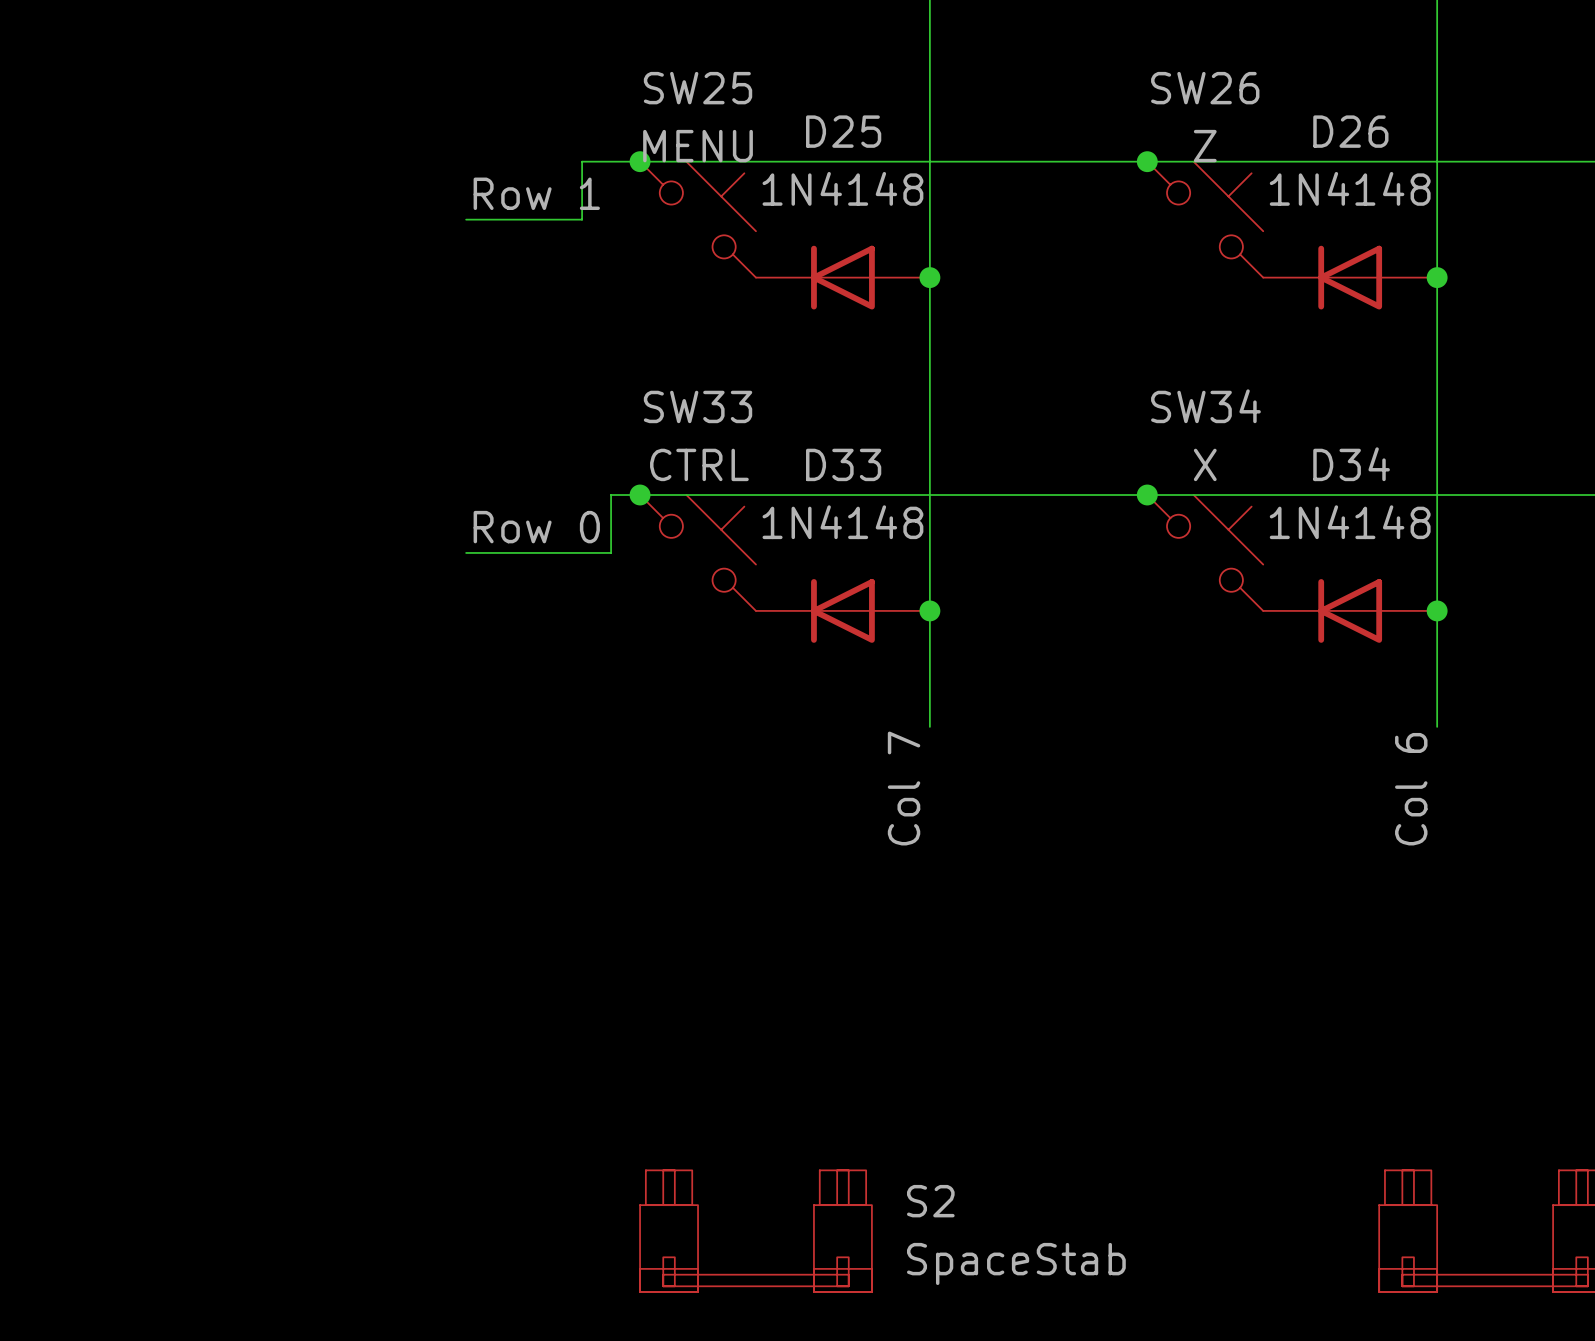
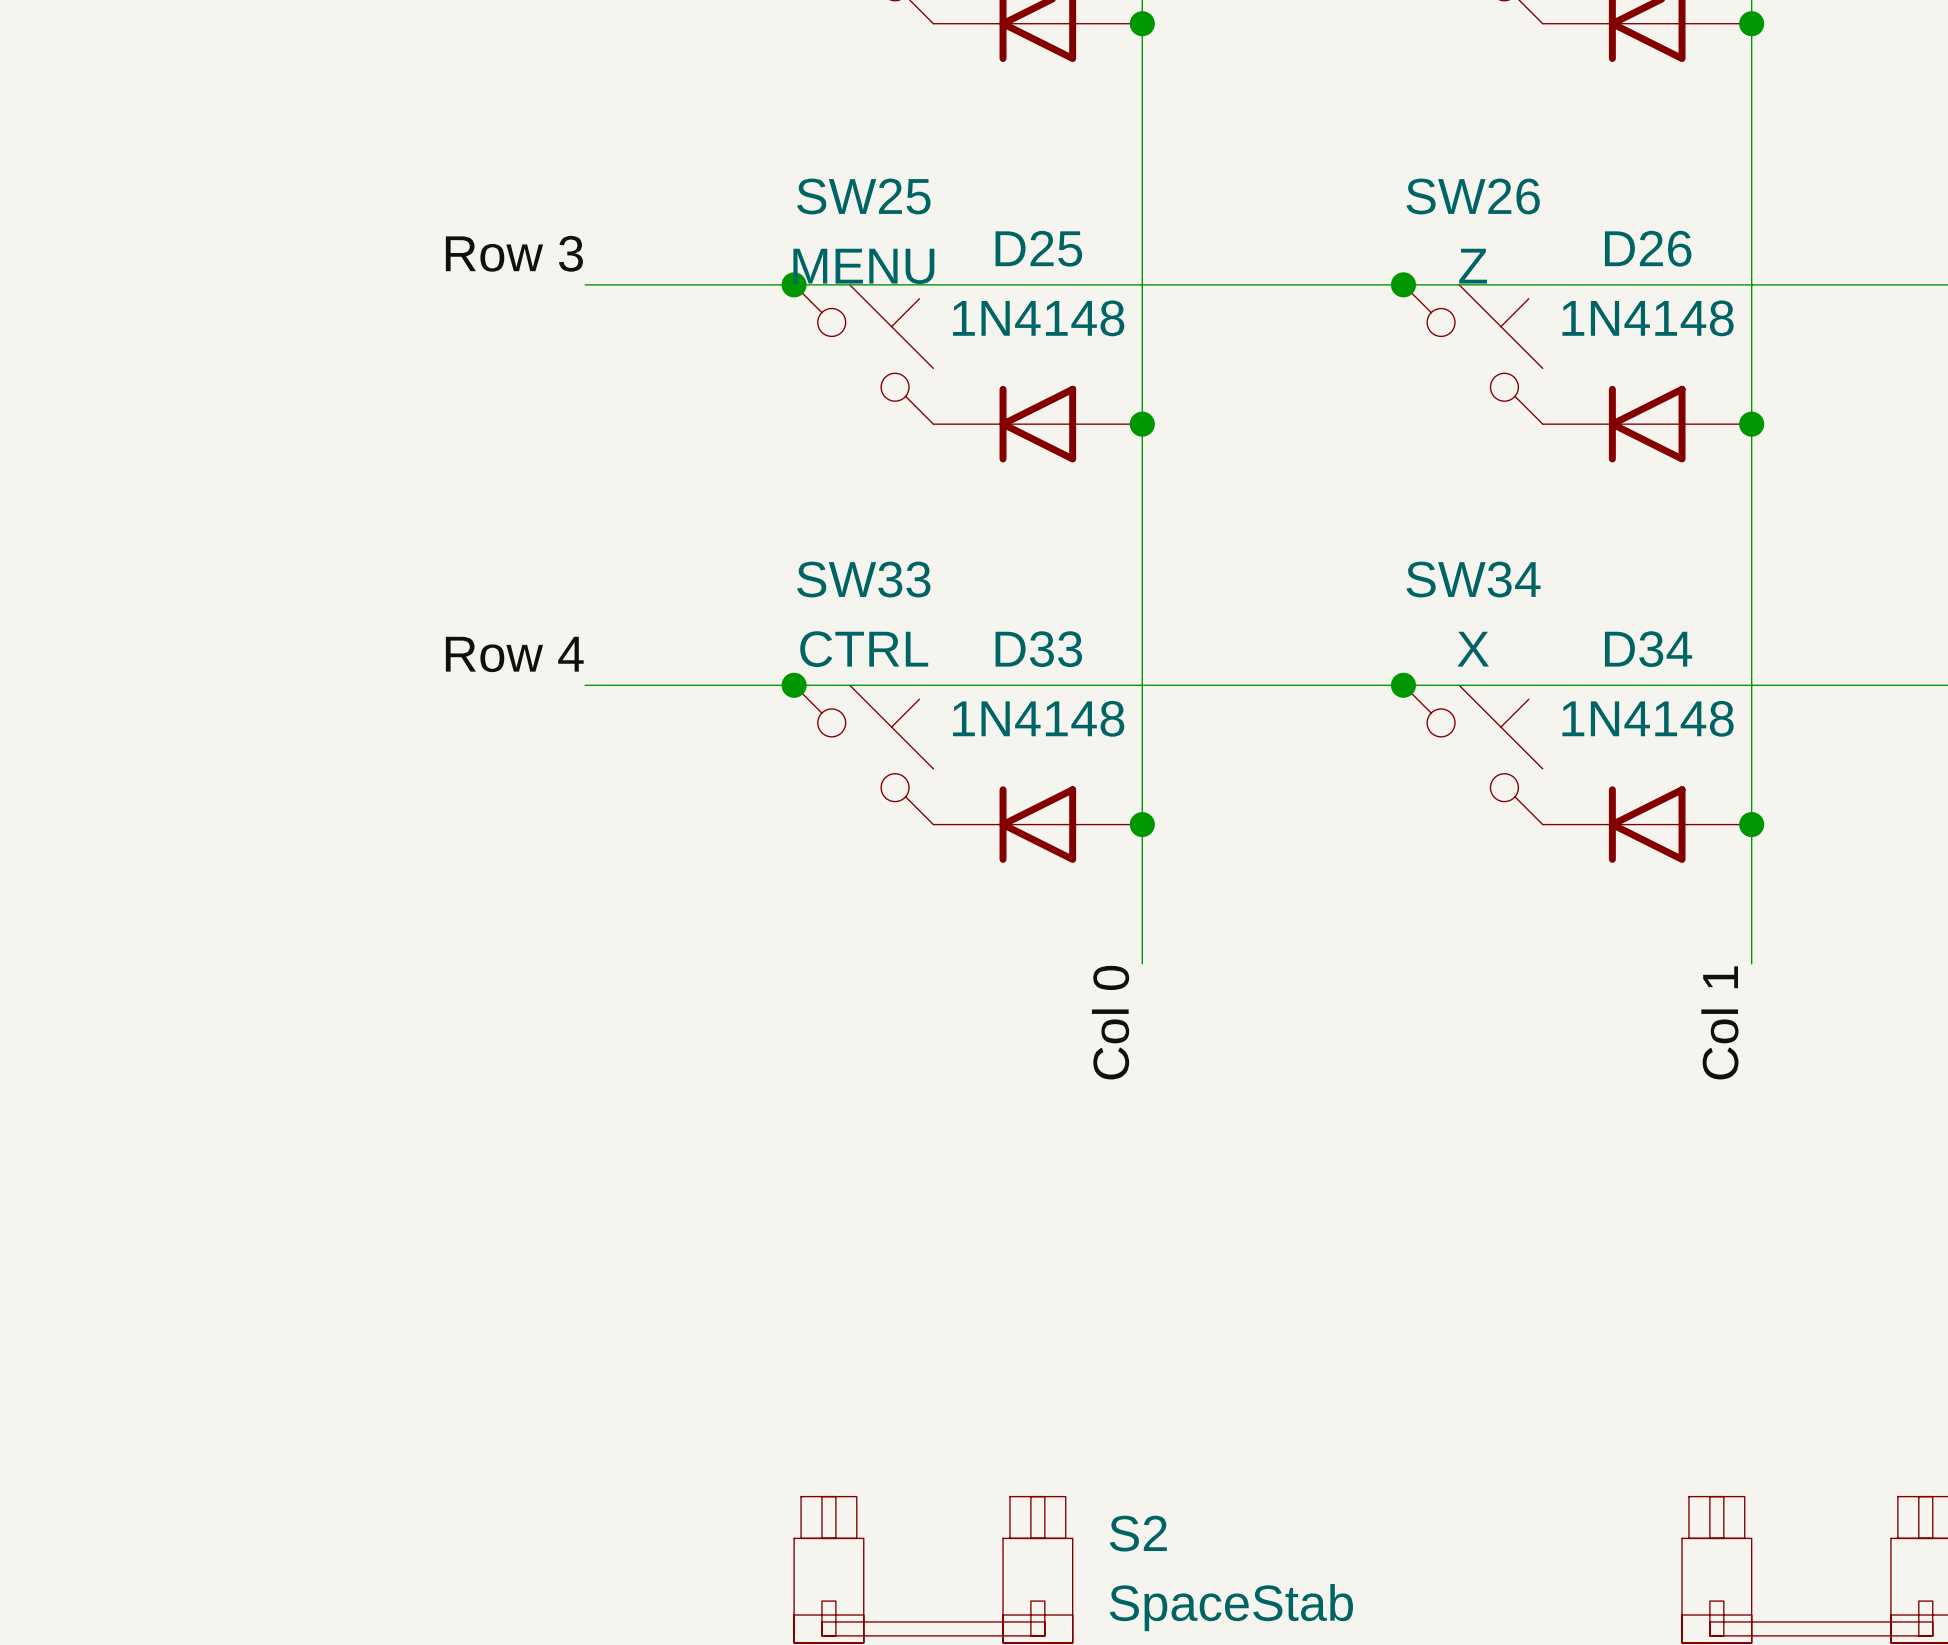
wire: (582, 161) (582, 219) (466, 219) -> (724, 284) (585, 284)
label: Row 1 (536, 193) -> Row 3 (514, 253)
wire: (611, 495) (611, 552) (466, 552) -> (759, 685) (585, 685)
label: Row 0 (536, 527) -> Row 4 (514, 654)
label: Col 7 (904, 788) -> Col 0 (1110, 1022)
label: Col 6 (1411, 789) -> Col 1 (1719, 1022)

